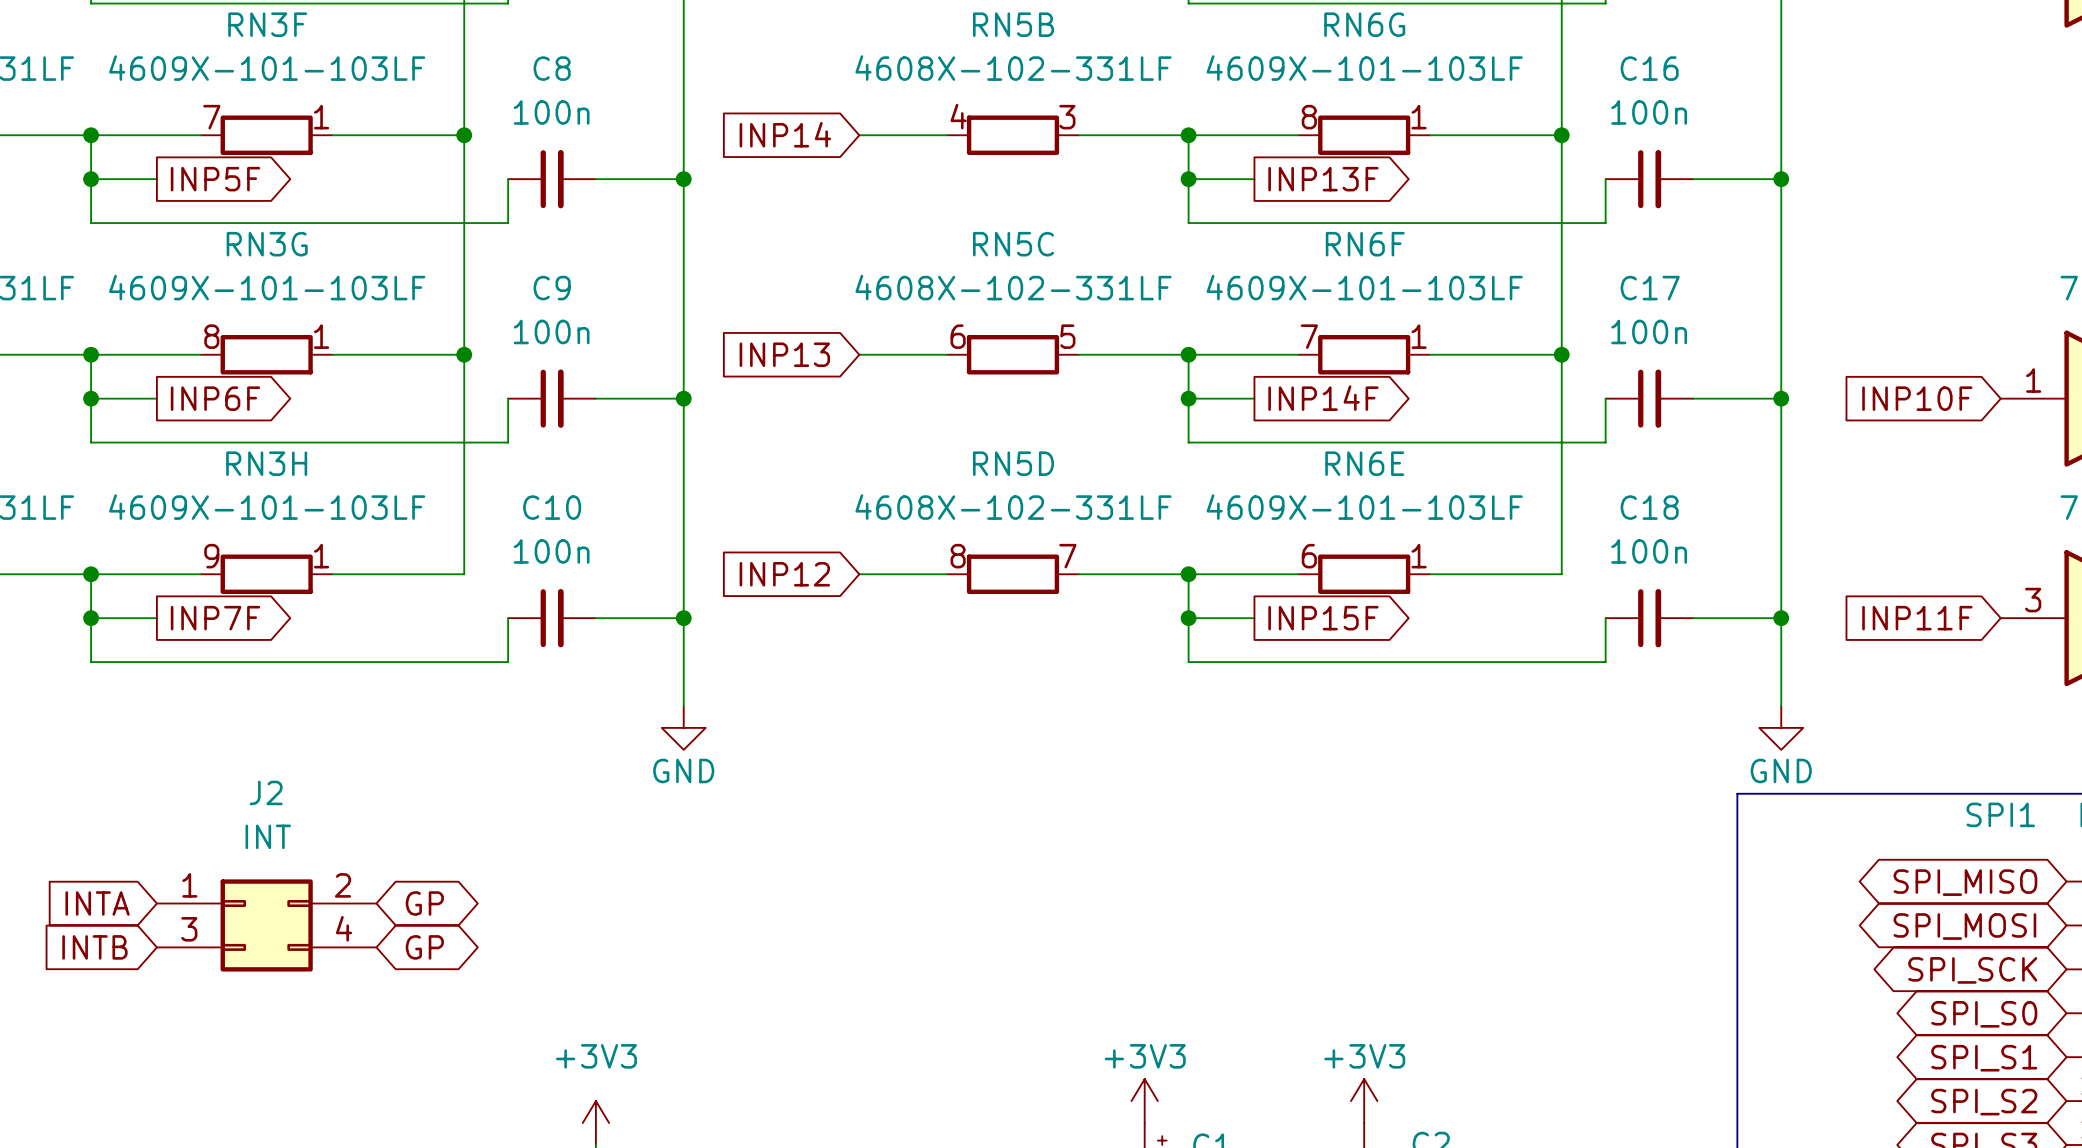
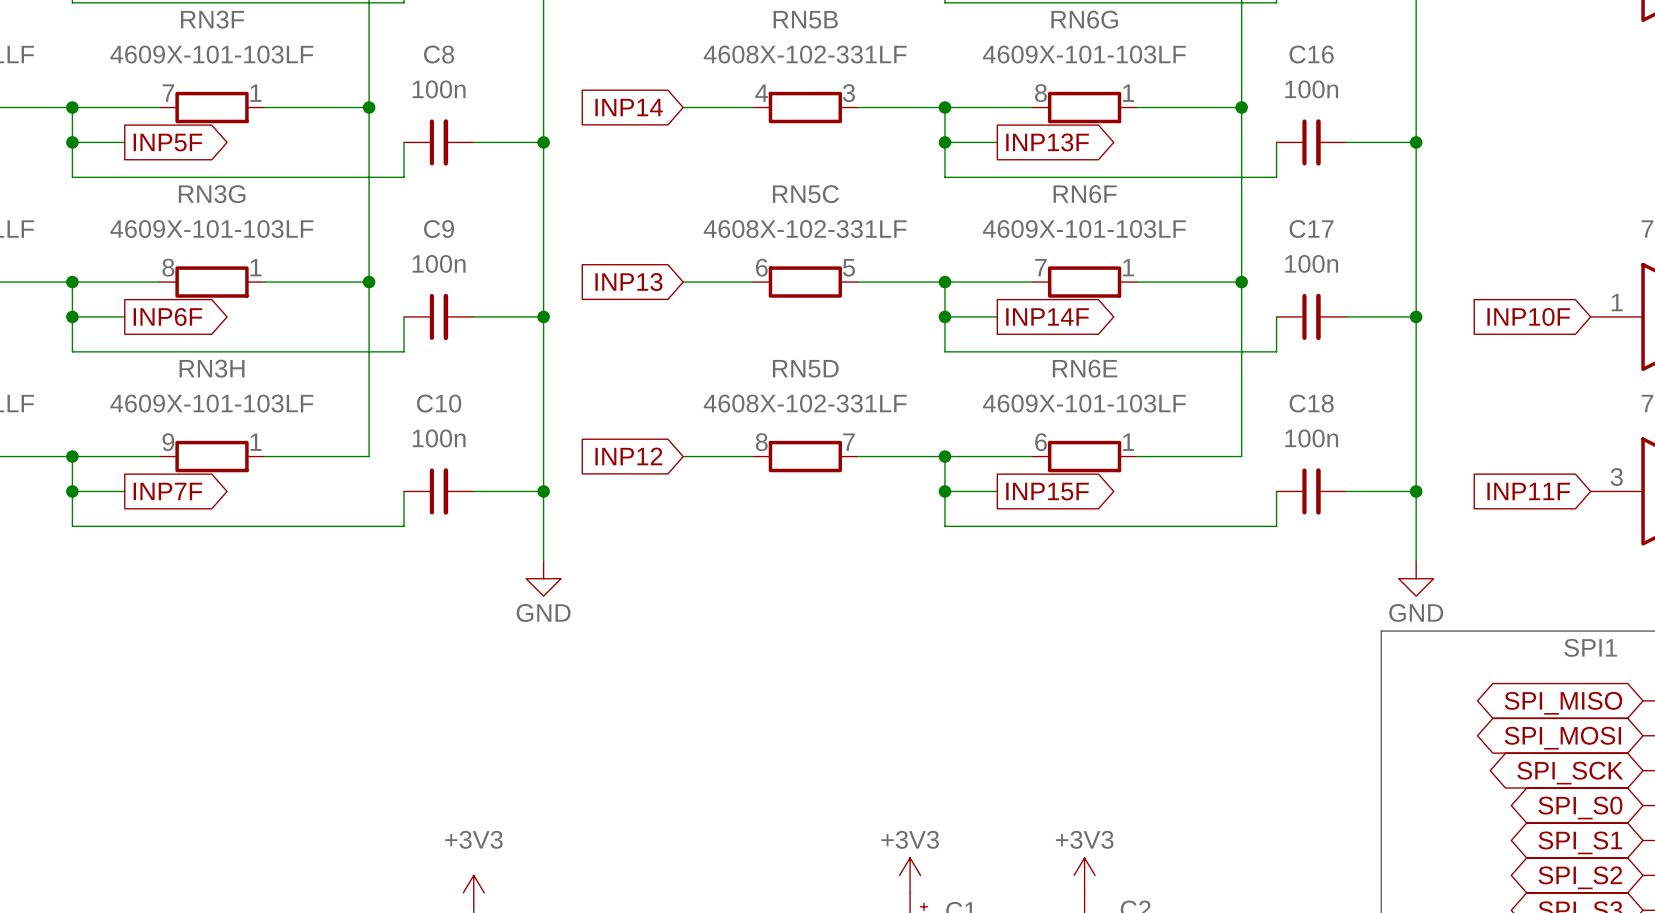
global label: INTA (97, 903) -> none
global label: GP (424, 903) -> none
J2: INT (266, 925) -> none
global label: INTB (94, 947) -> none
global label: GP (424, 947) -> none

